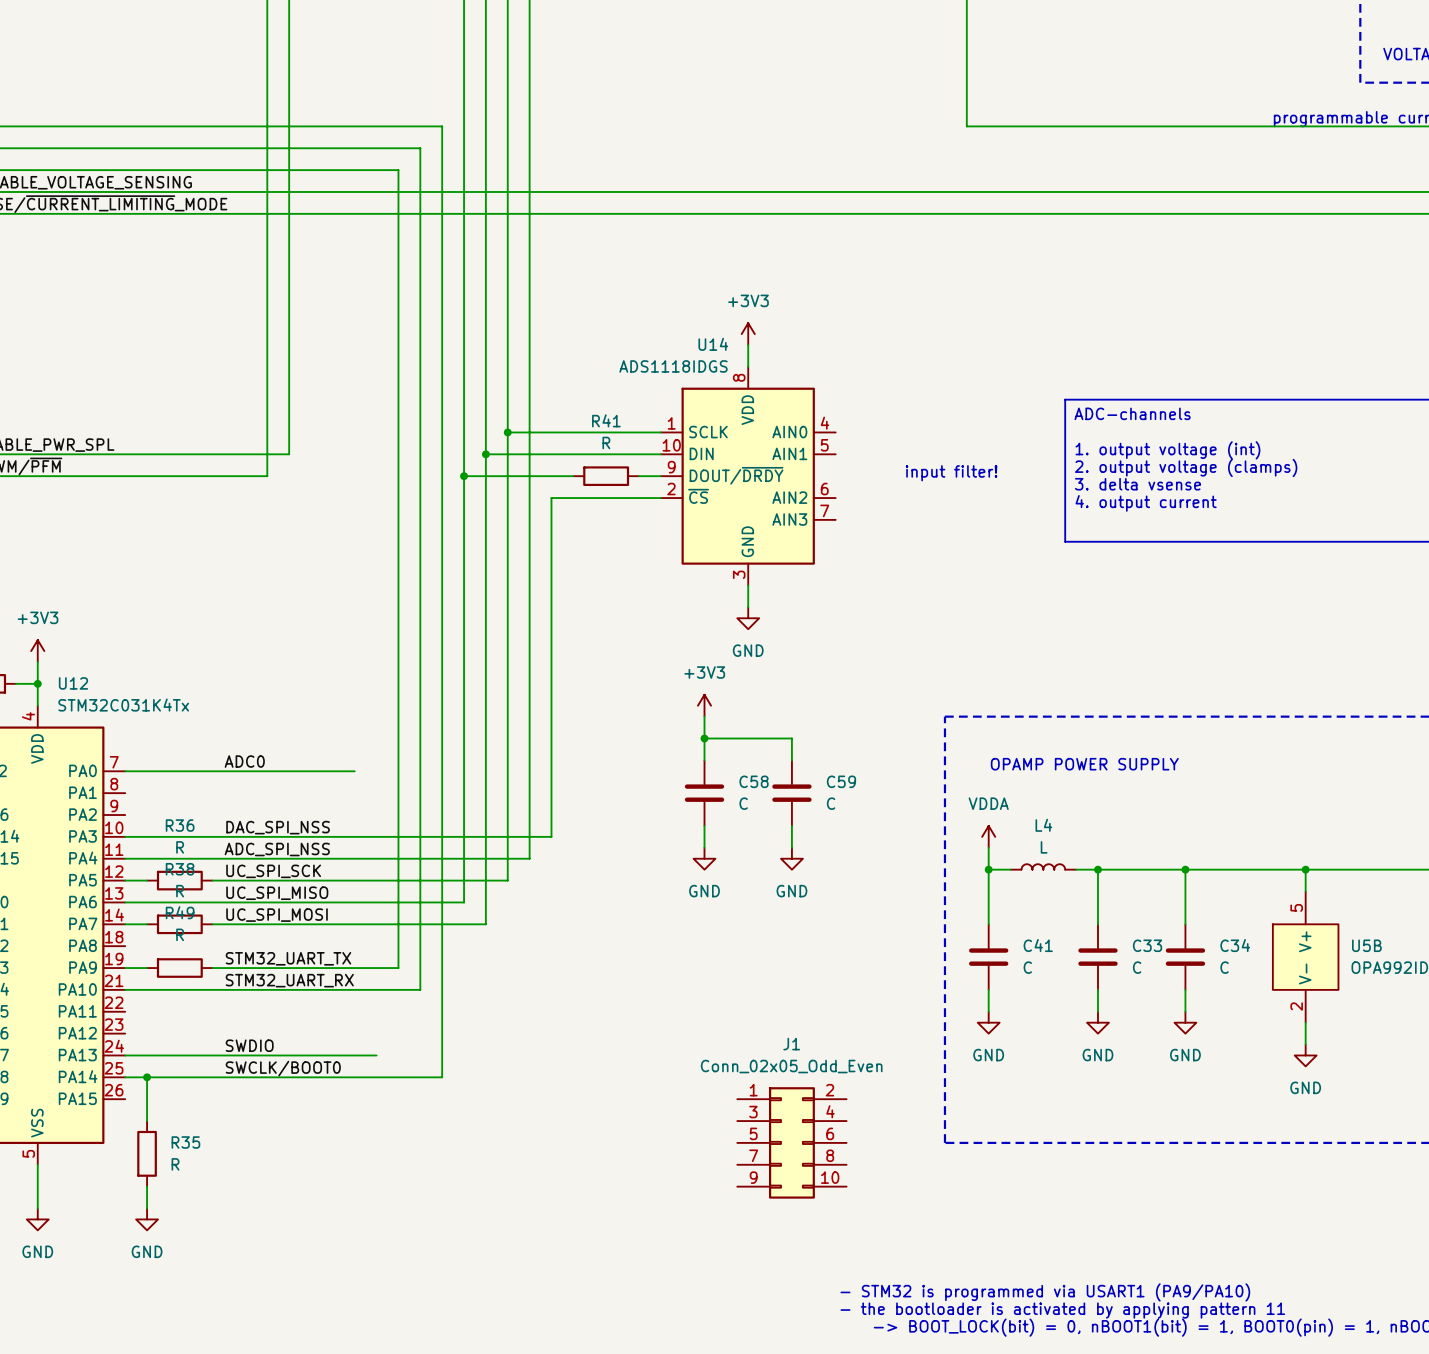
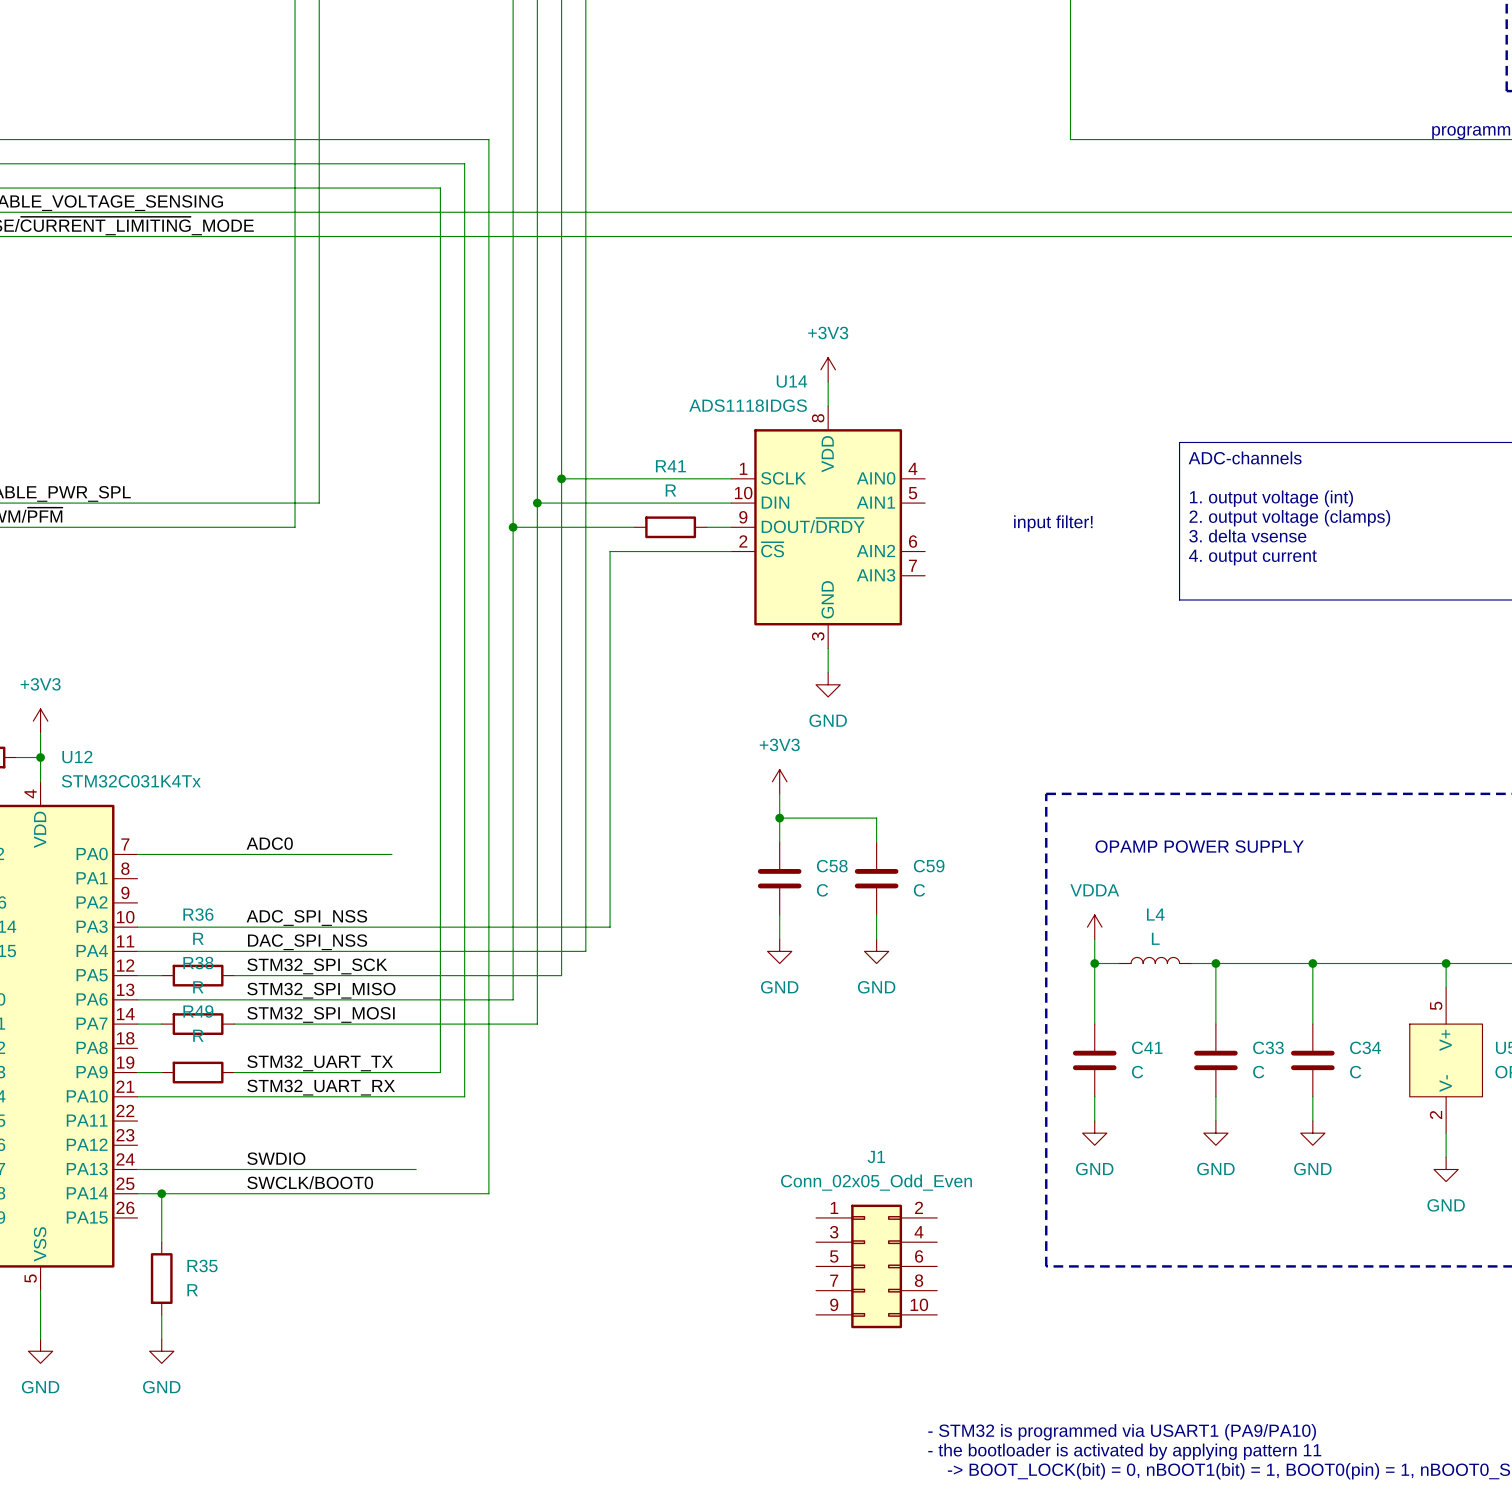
label: DAC_SPI_NSS (278, 827) -> ADC_SPI_NSS (306, 918)
label: ADC_SPI_NSS (277, 849) -> DAC_SPI_NSS (307, 942)
label: UC_SPI_SCK (273, 871) -> STM32_SPI_SCK (317, 966)
label: UC_SPI_MISO (277, 893) -> STM32_SPI_MISO (321, 990)
label: UC_SPI_MOSI (277, 915) -> STM32_SPI_MOSI (321, 1014)

